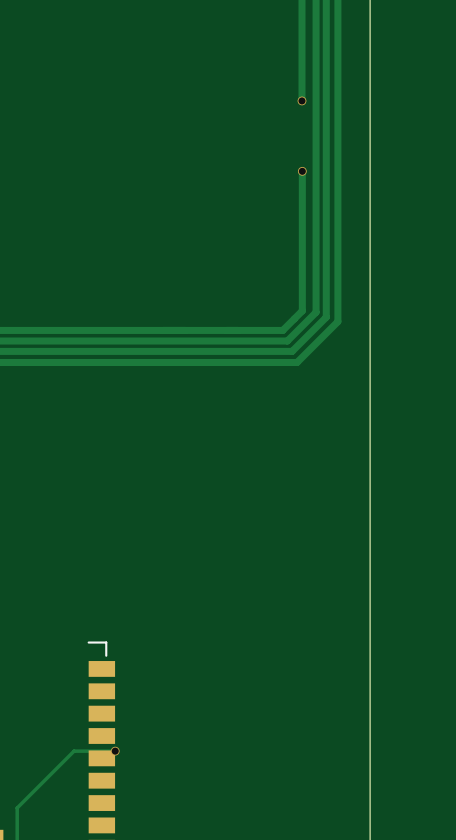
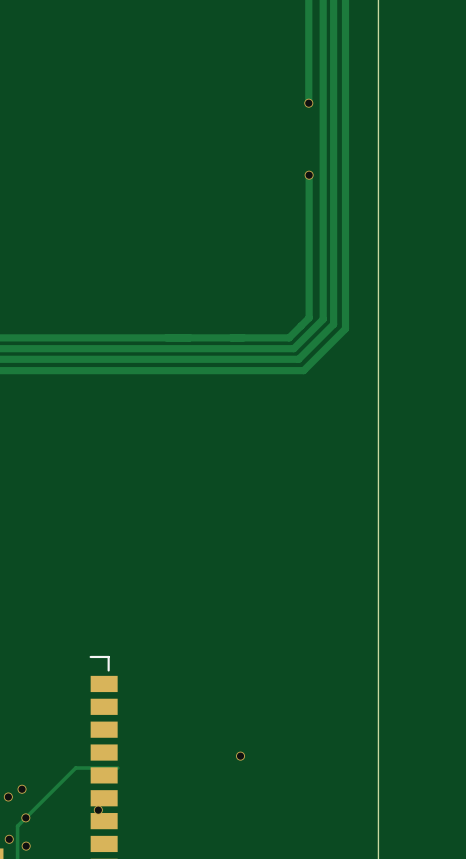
via: none -> (240, 756)
via position: (115, 751) -> (98, 810)
via: none -> (22, 789)
via: none -> (8, 796)
via: none -> (25, 817)
via: none -> (9, 839)
via: none -> (26, 846)

